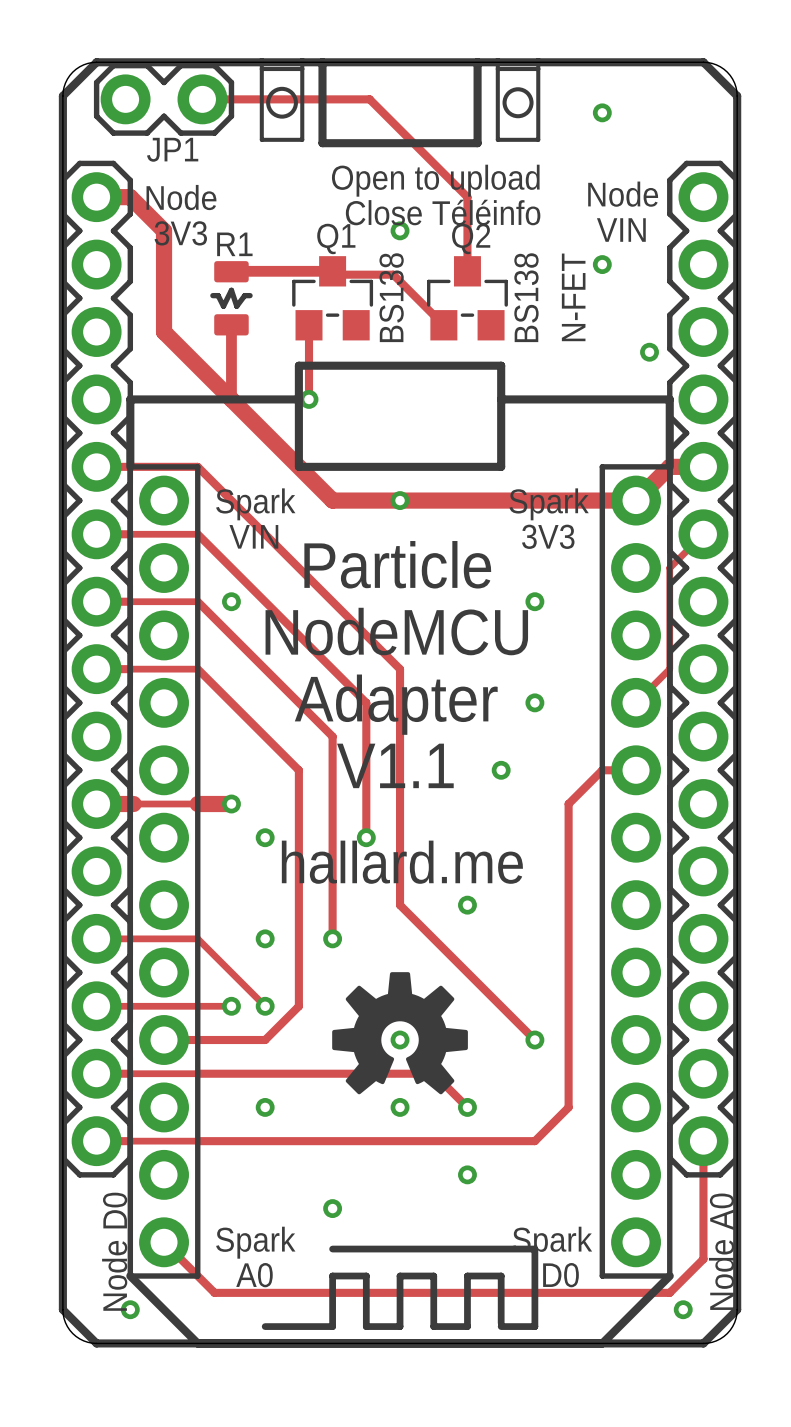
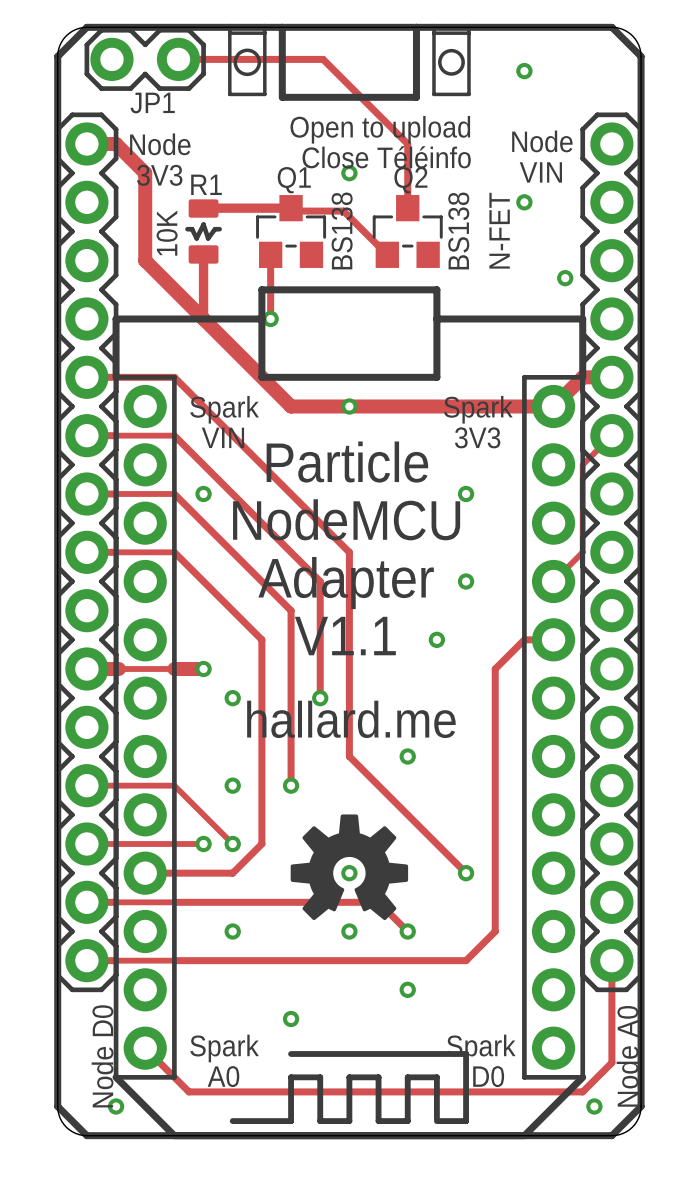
R1 value: none -> 10K (167, 233)

